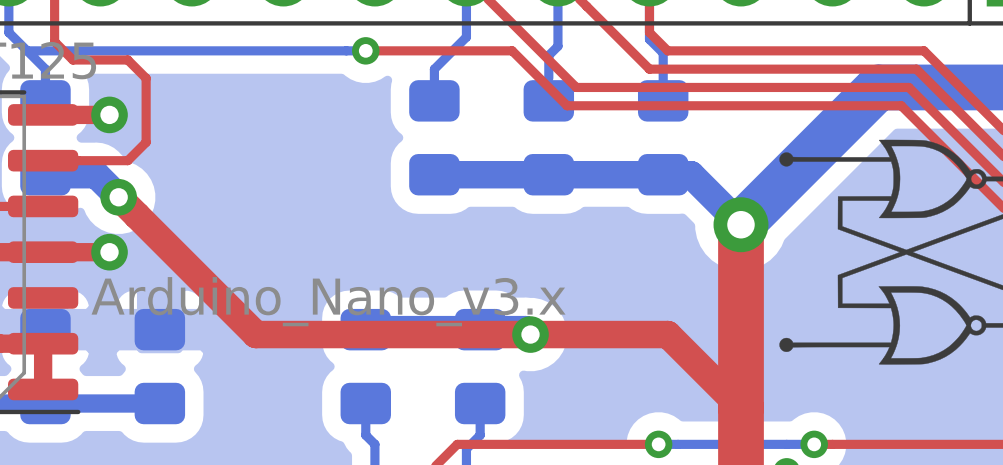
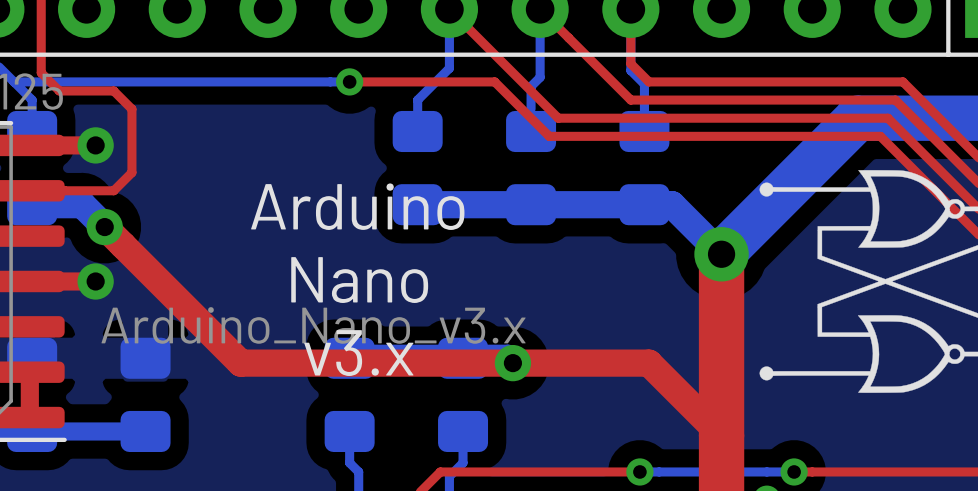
text: none -> Arduino (357, 206)
text: none -> Nano (359, 280)
text: none -> v3.x (358, 353)

